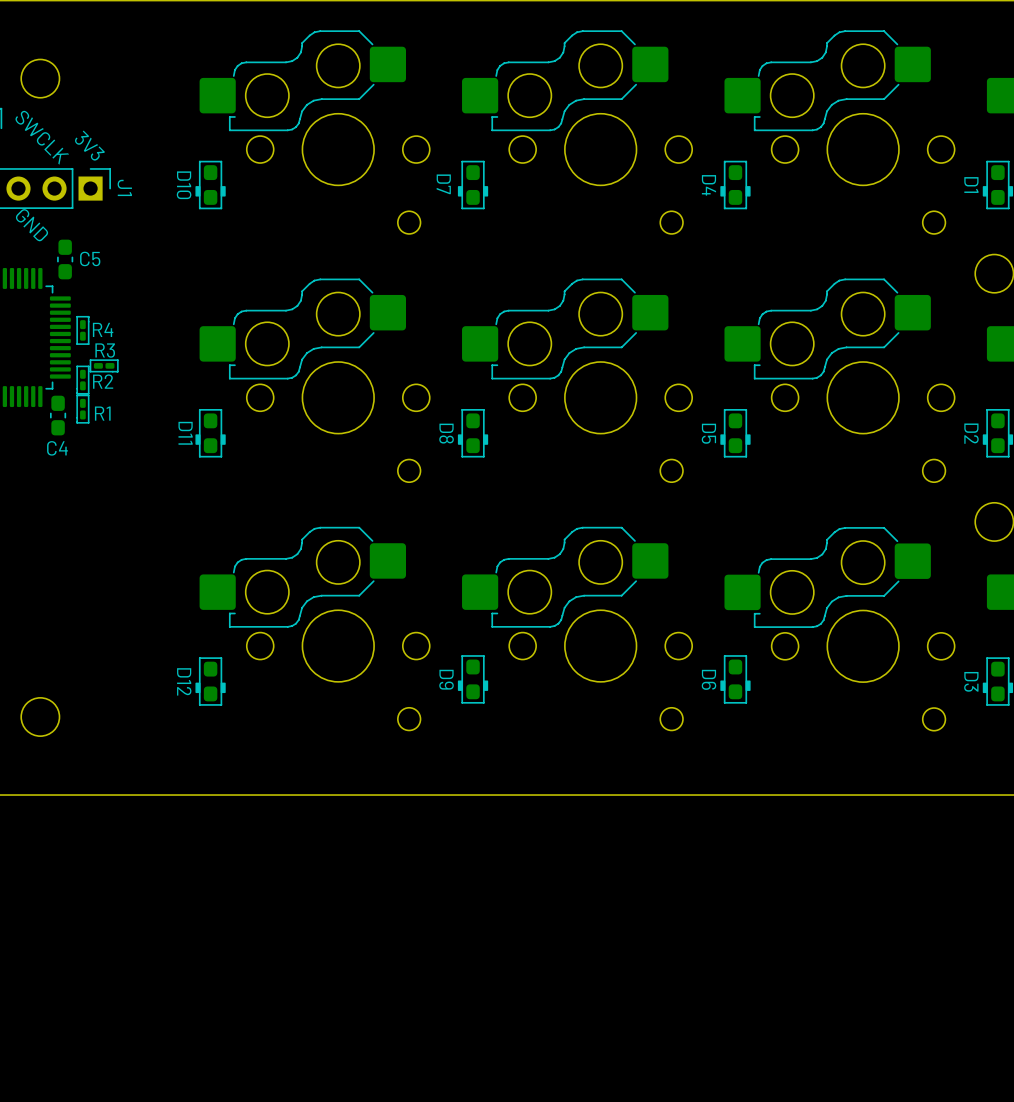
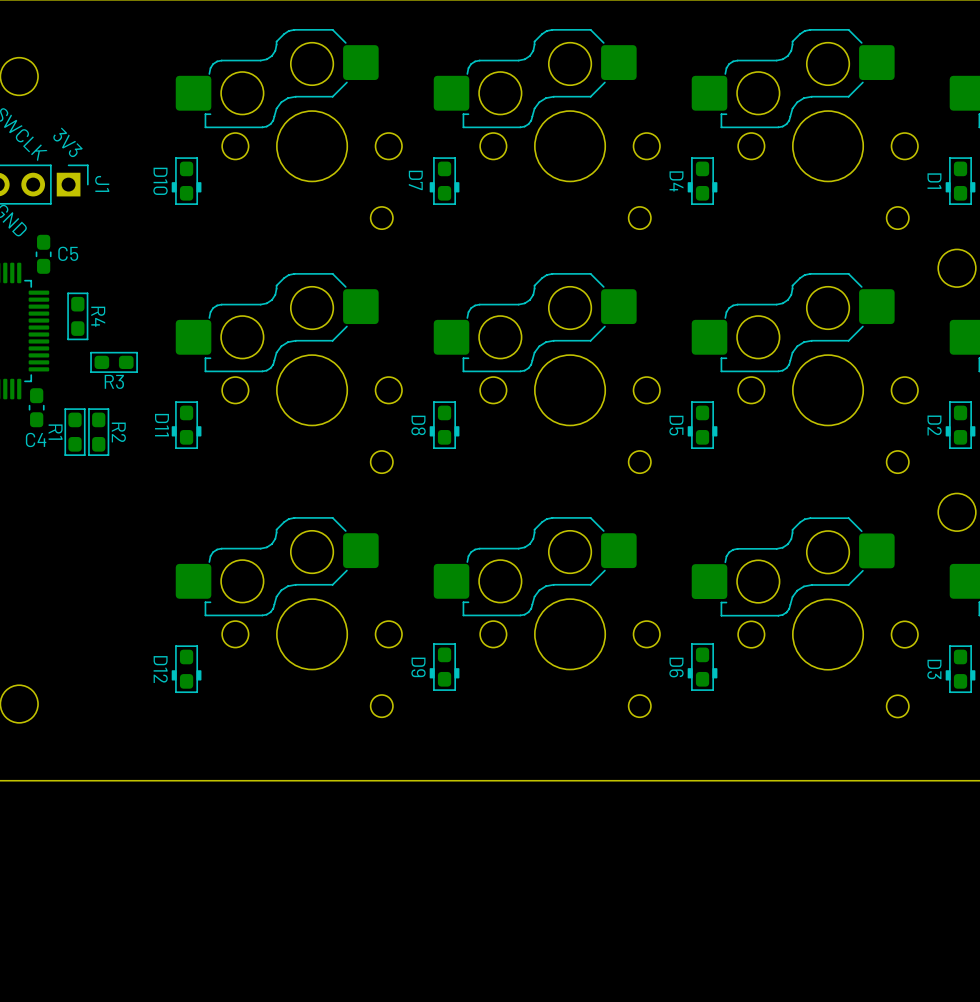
R4 footprint: [76, 316, 90, 345] -> [67, 292, 89, 341]
R3 name position: R3 (105, 350) -> R3 (114, 381)
R3 footprint: [89, 359, 119, 373] -> [90, 351, 138, 373]
R2 footprint: [76, 365, 90, 395] -> [88, 408, 110, 456]
R1 footprint: [76, 394, 90, 424] -> [64, 408, 86, 456]
R1 name position: R1 (102, 413) -> R1 (55, 432)

